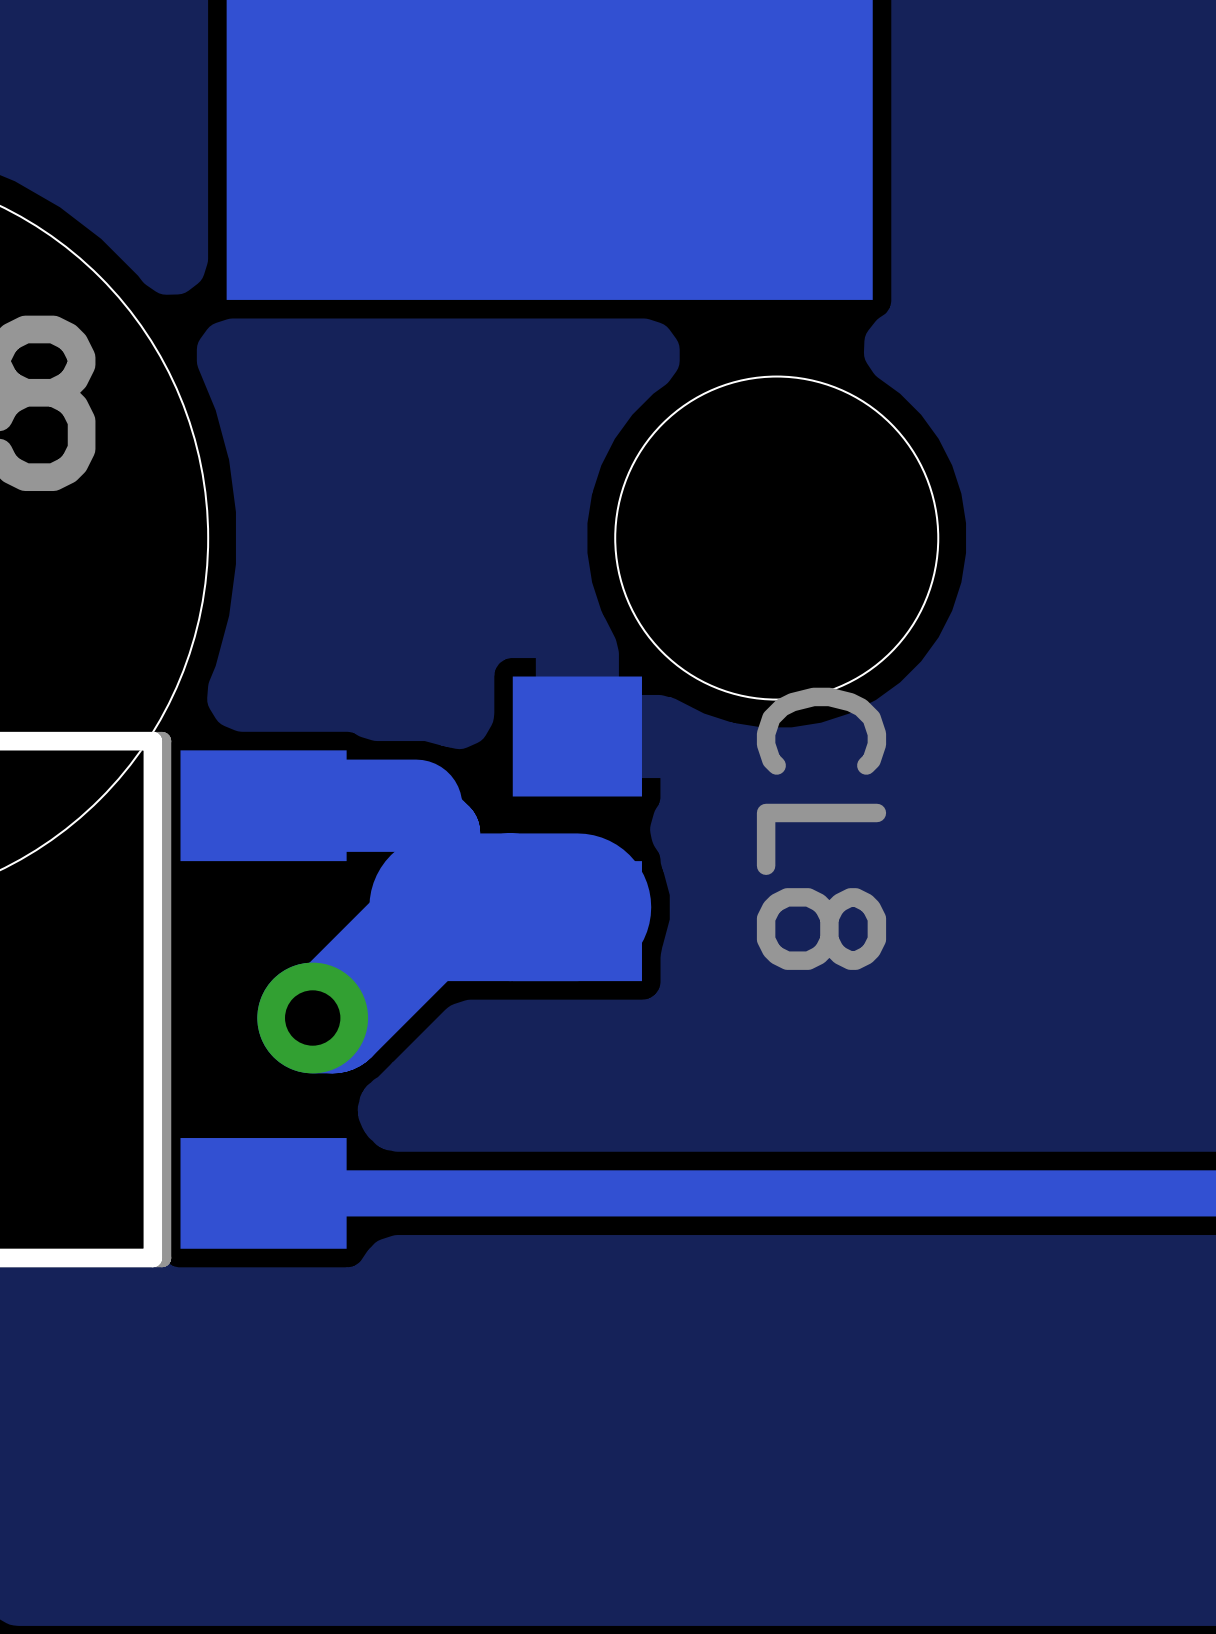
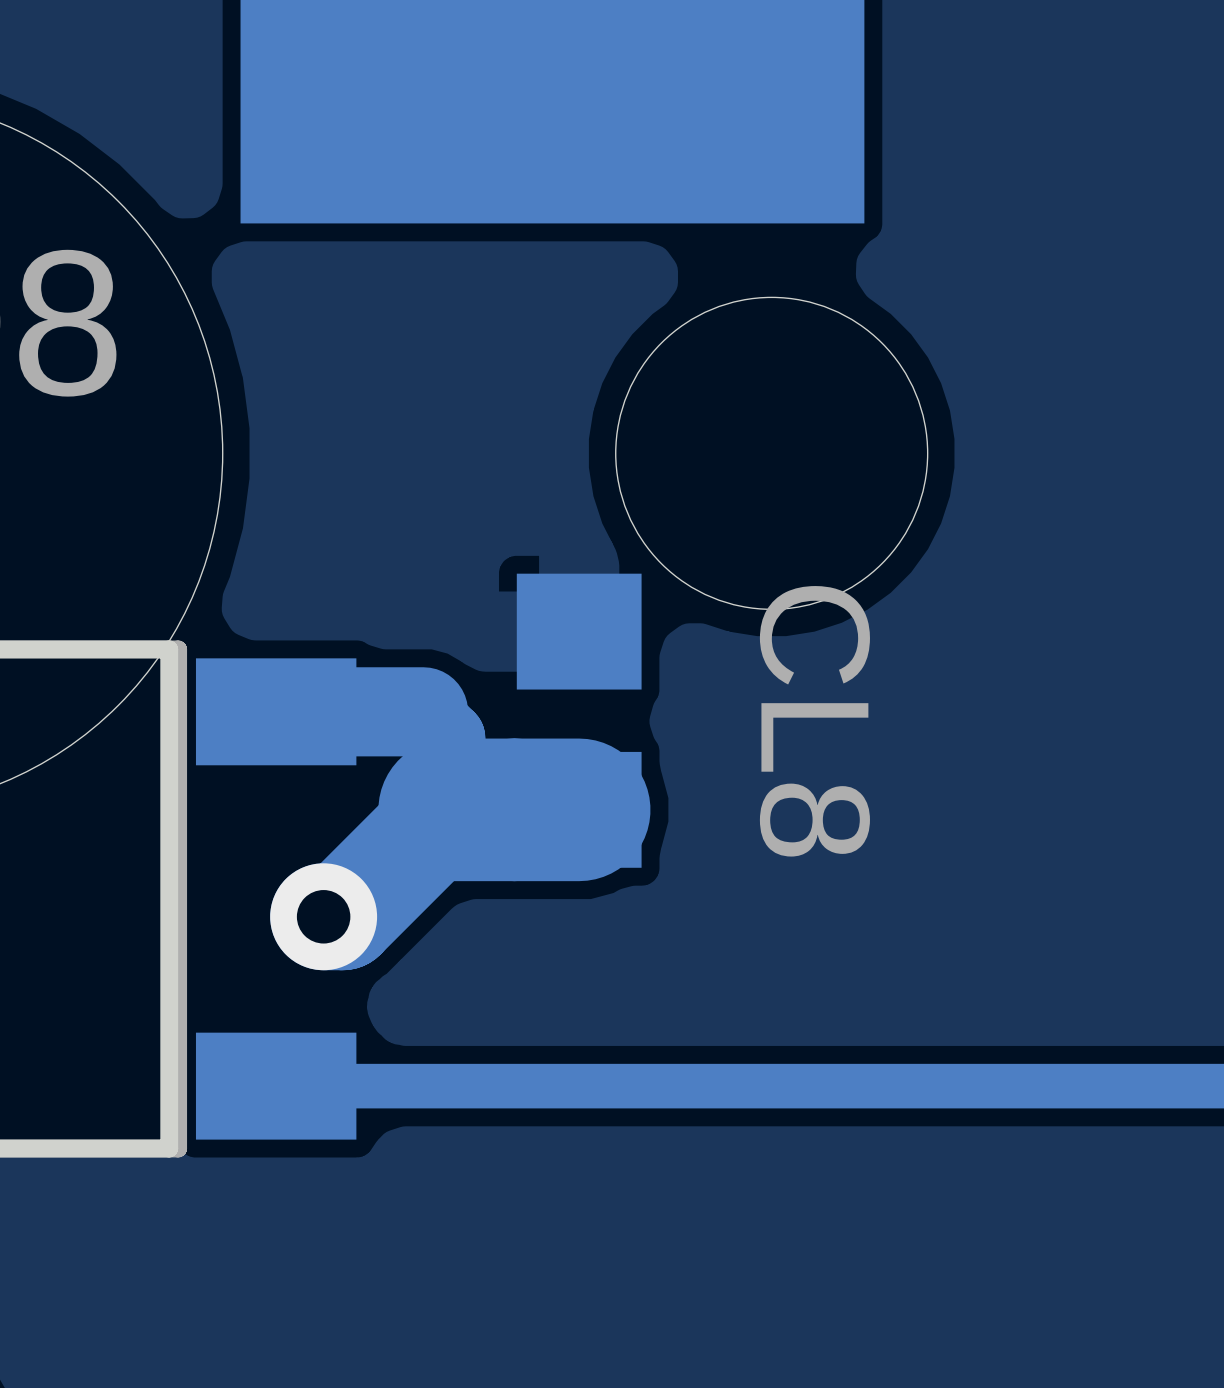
CL8 position: (577, 828) -> (579, 720)

